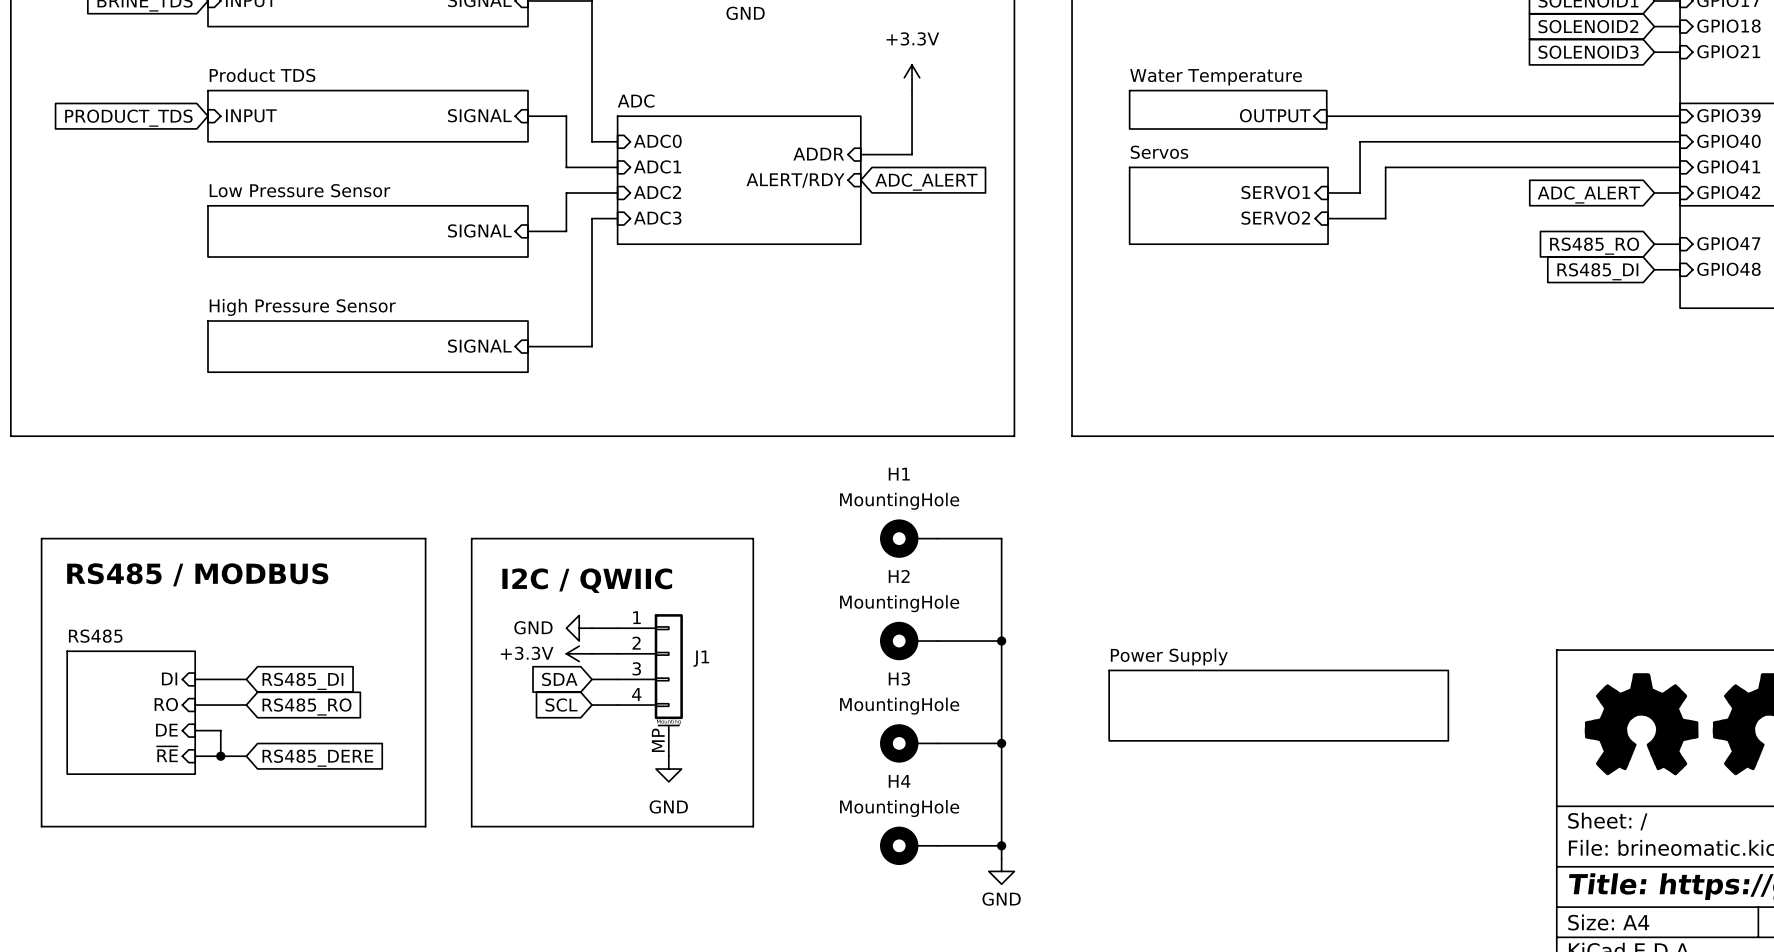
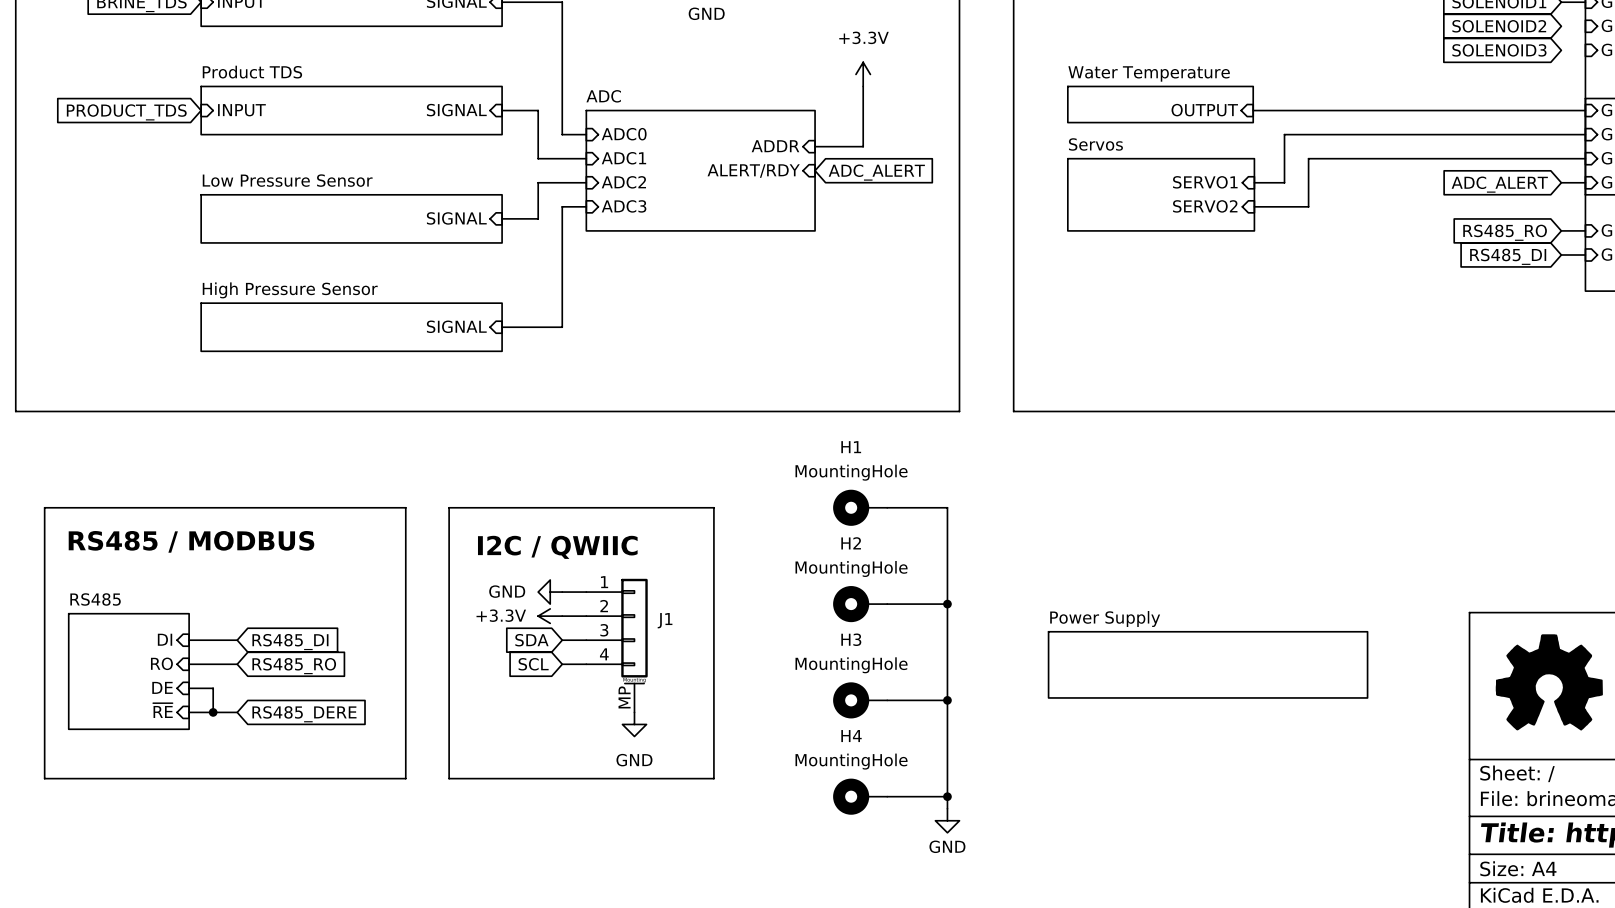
wire: (1654, 26) (1680, 26) -> none
wire: (1654, 52) (1680, 52) -> none

